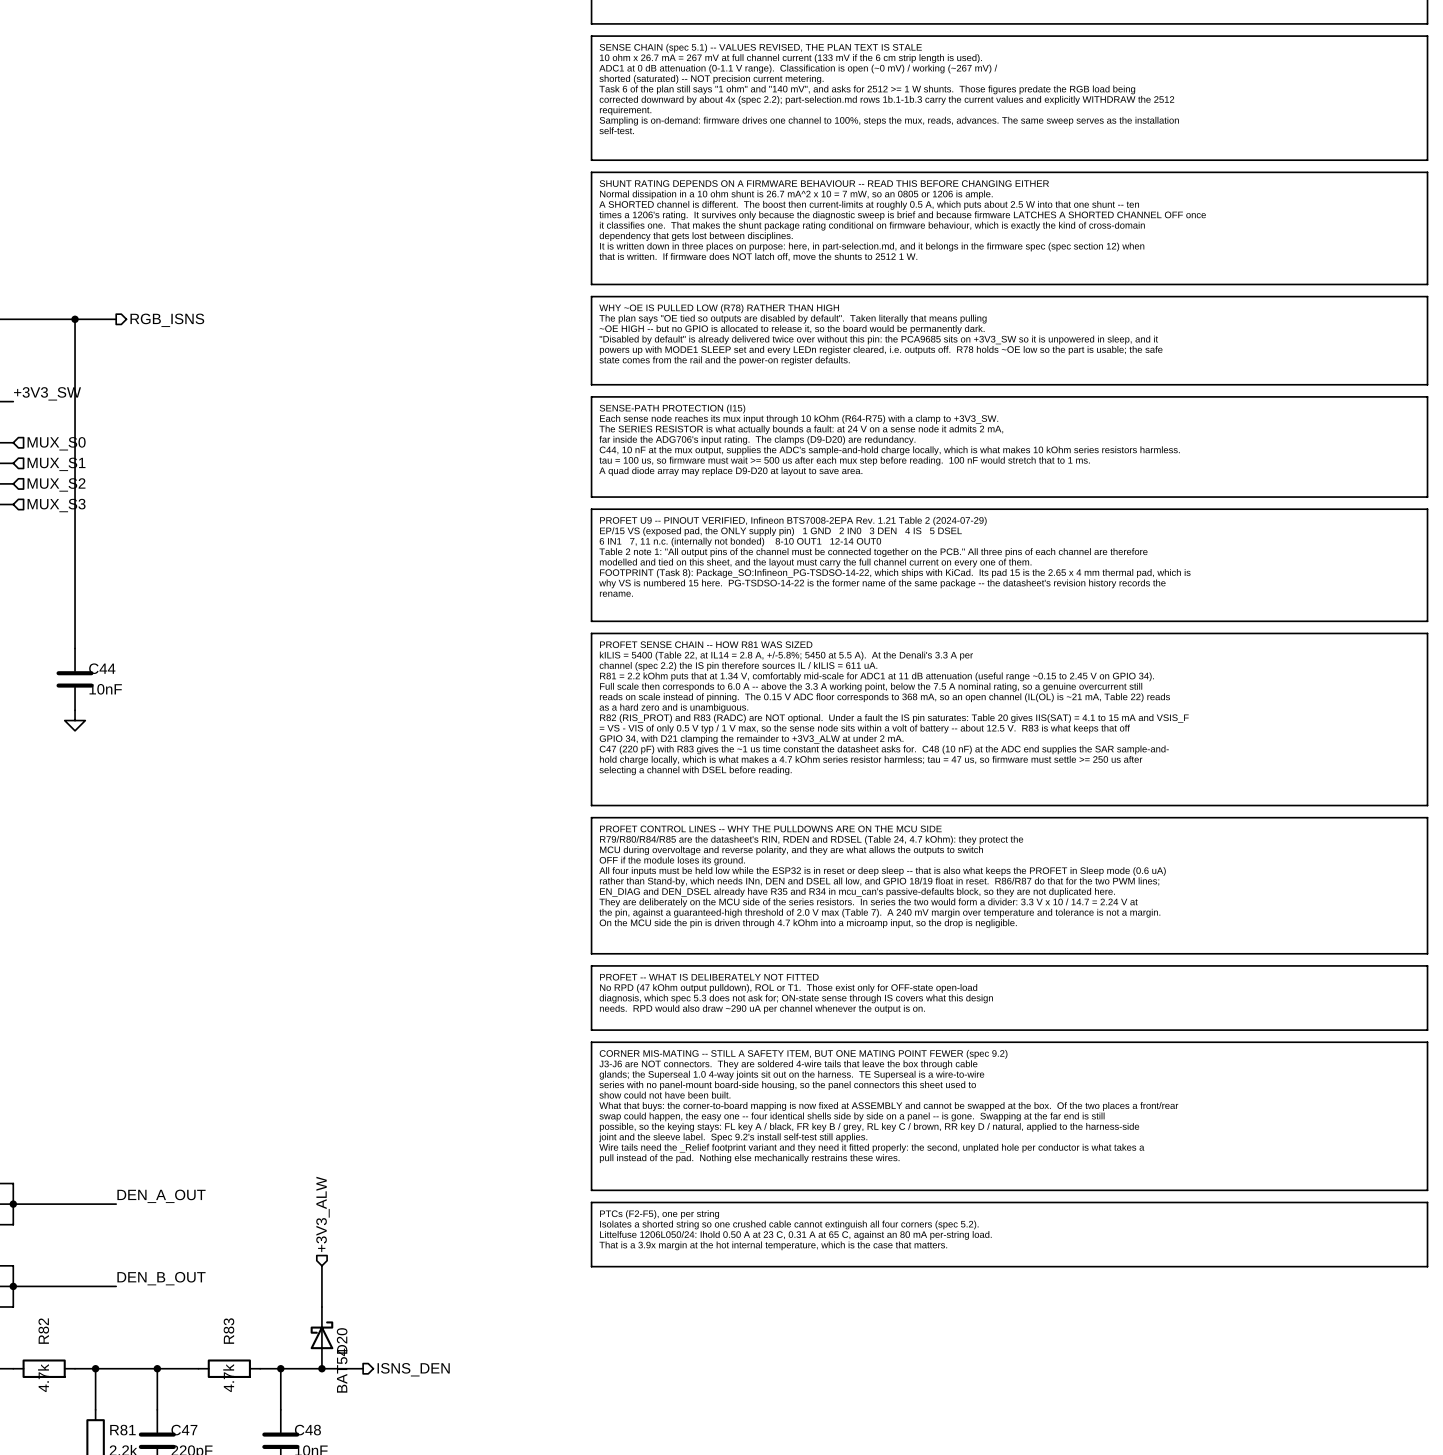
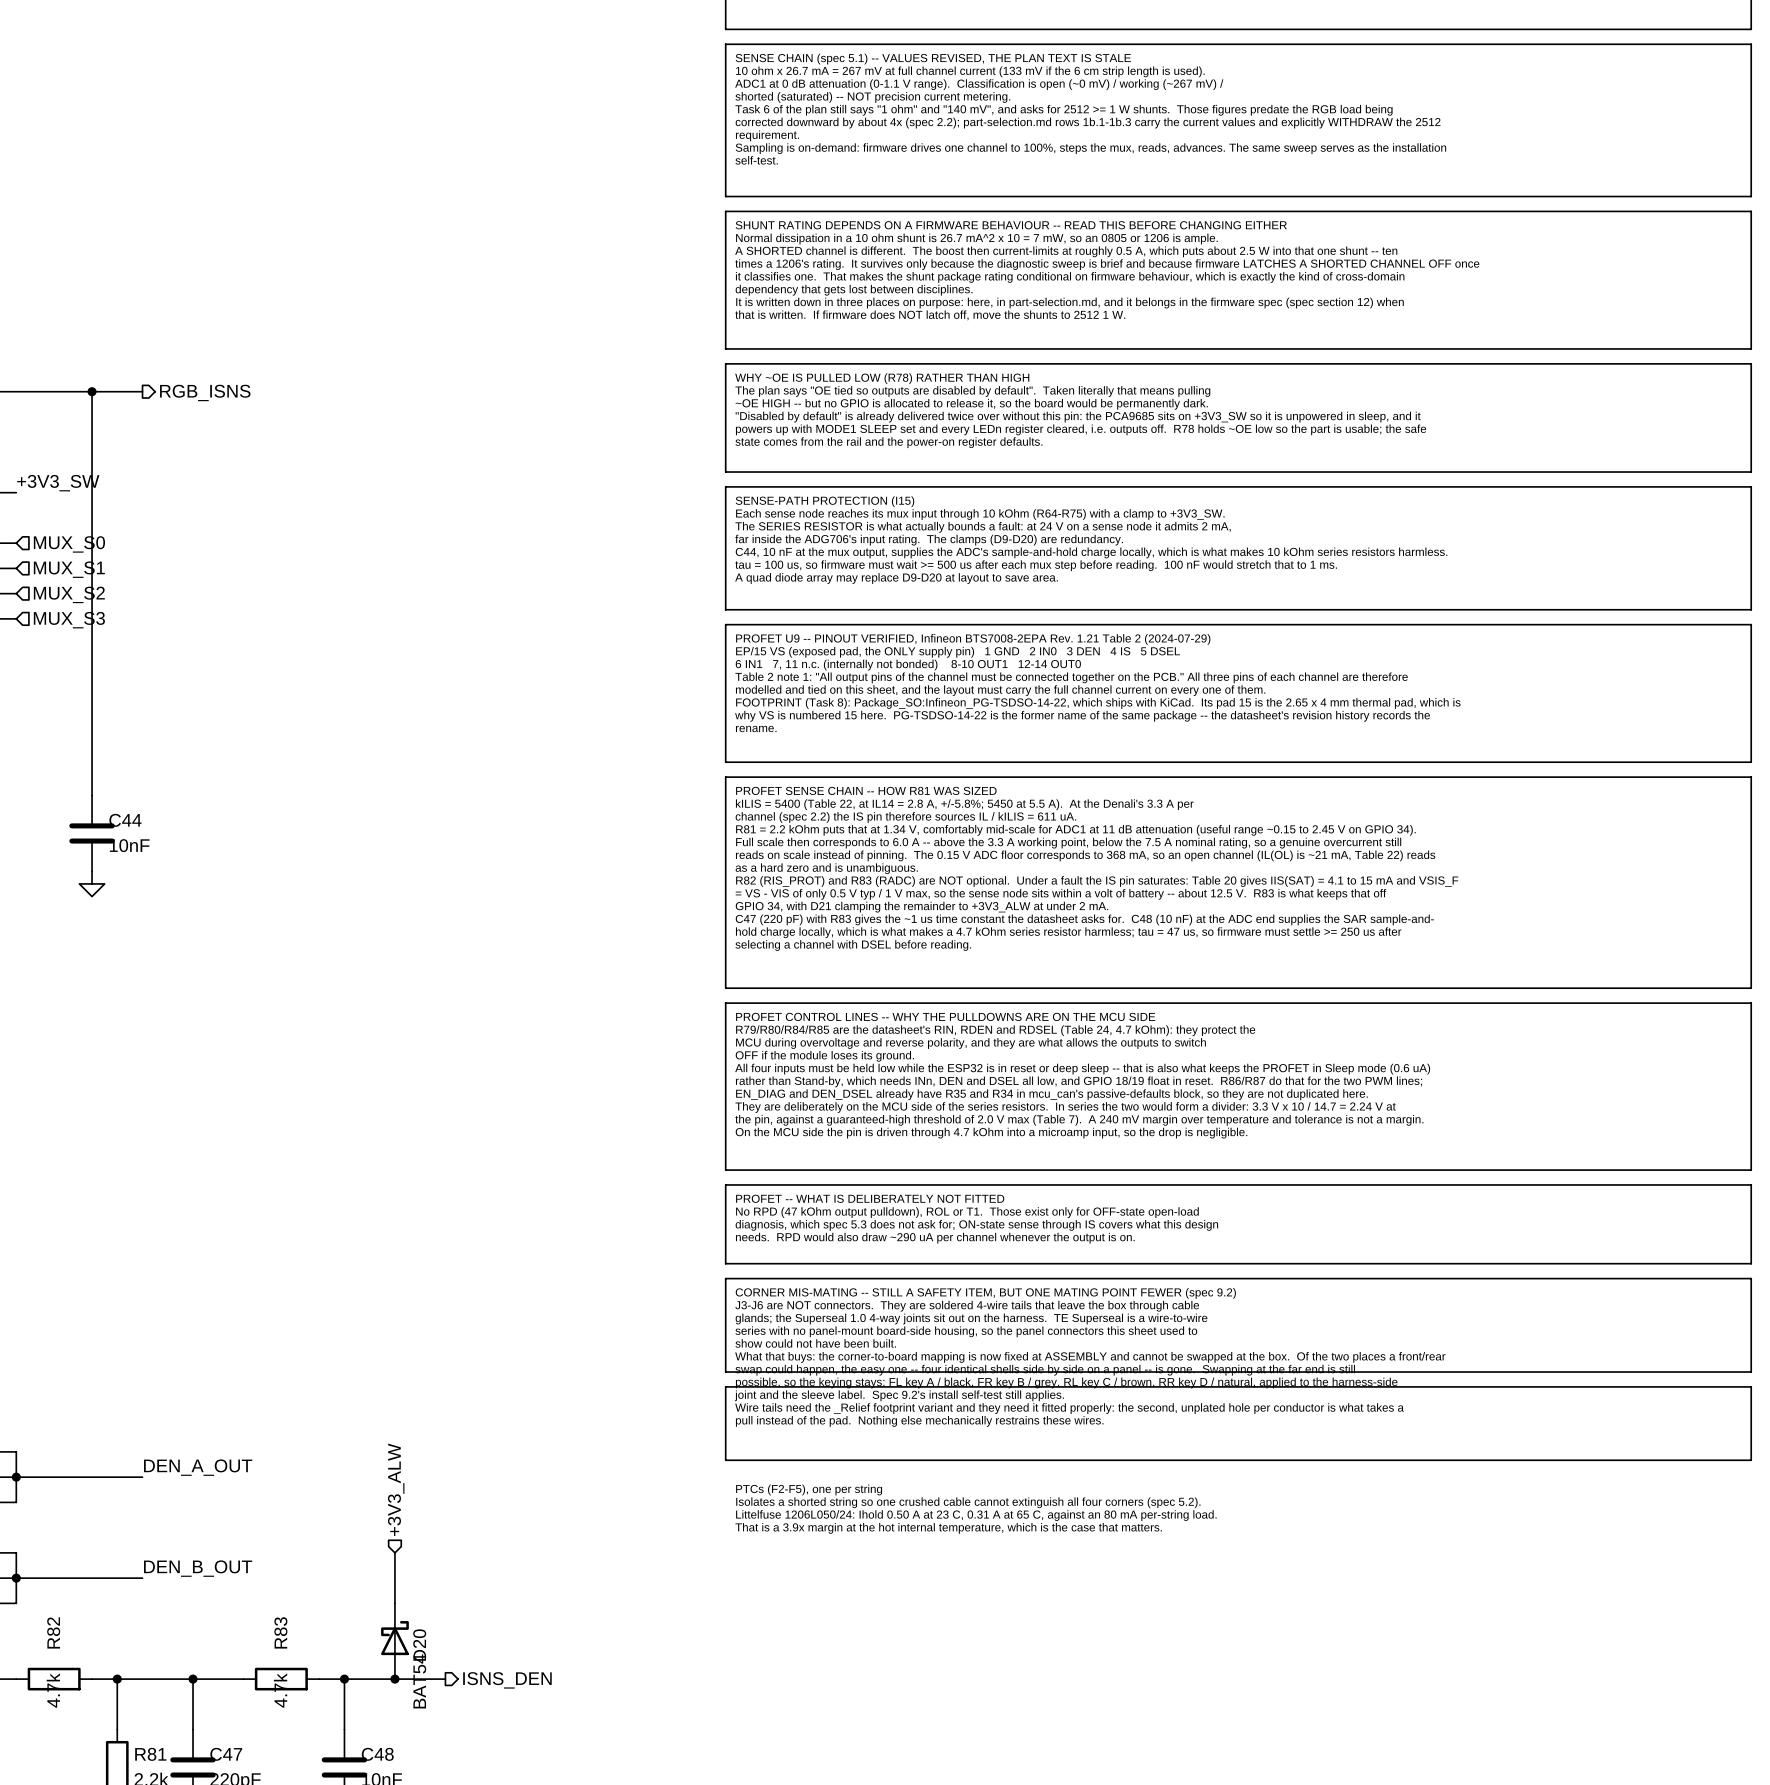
line: (591, 1118) (591, 1130) -> (725, 1372) (1751, 1372)
line: (1427, 1118) (1427, 1130) -> (725, 1386) (1751, 1386)
line: (591, 1202) (1427, 1202) (1427, 1266) (591, 1266) (591, 1202) -> none

